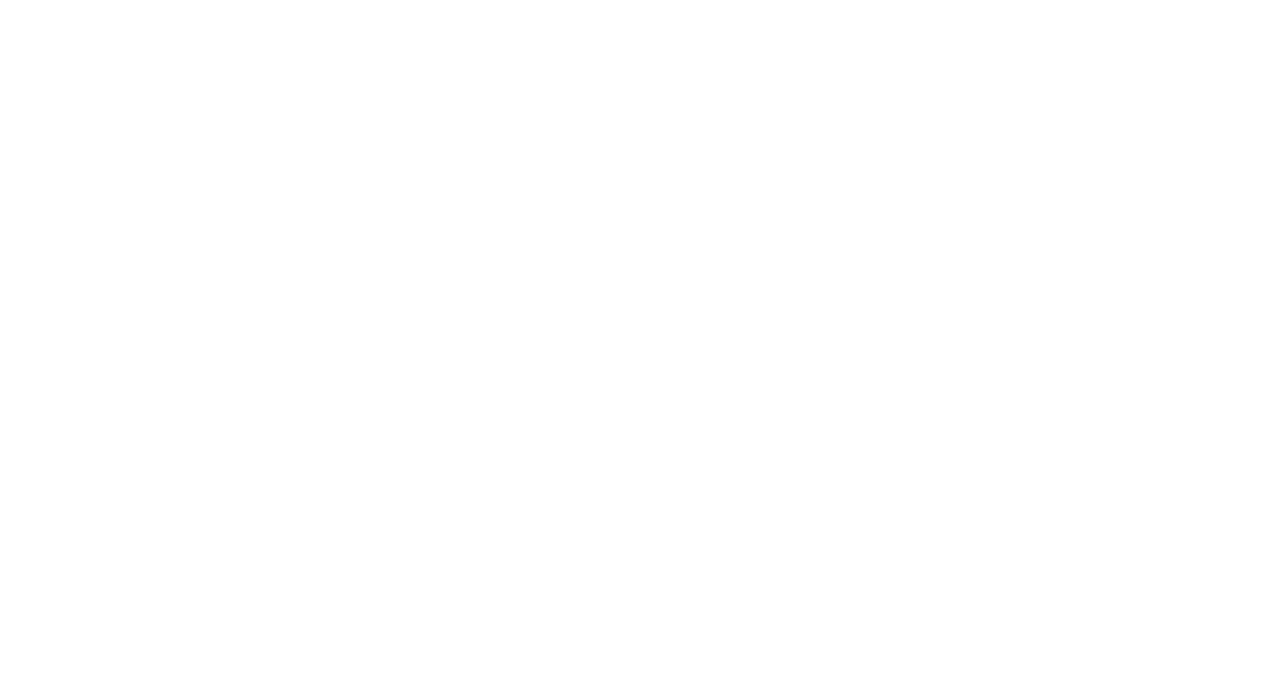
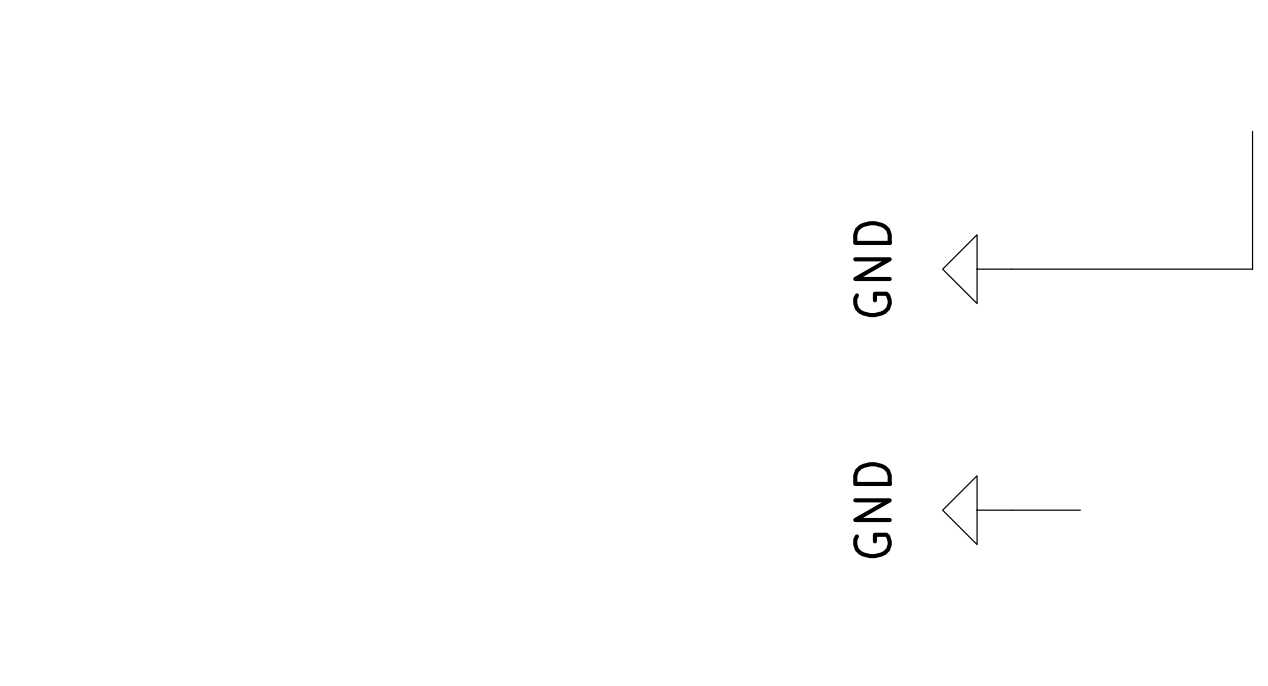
wire: none -> (1252, 131) (1252, 269) (1011, 269)
power symbol: none -> GND (977, 269)
power symbol: none -> GND (977, 510)
wire: none -> (1011, 510) (1080, 510)

